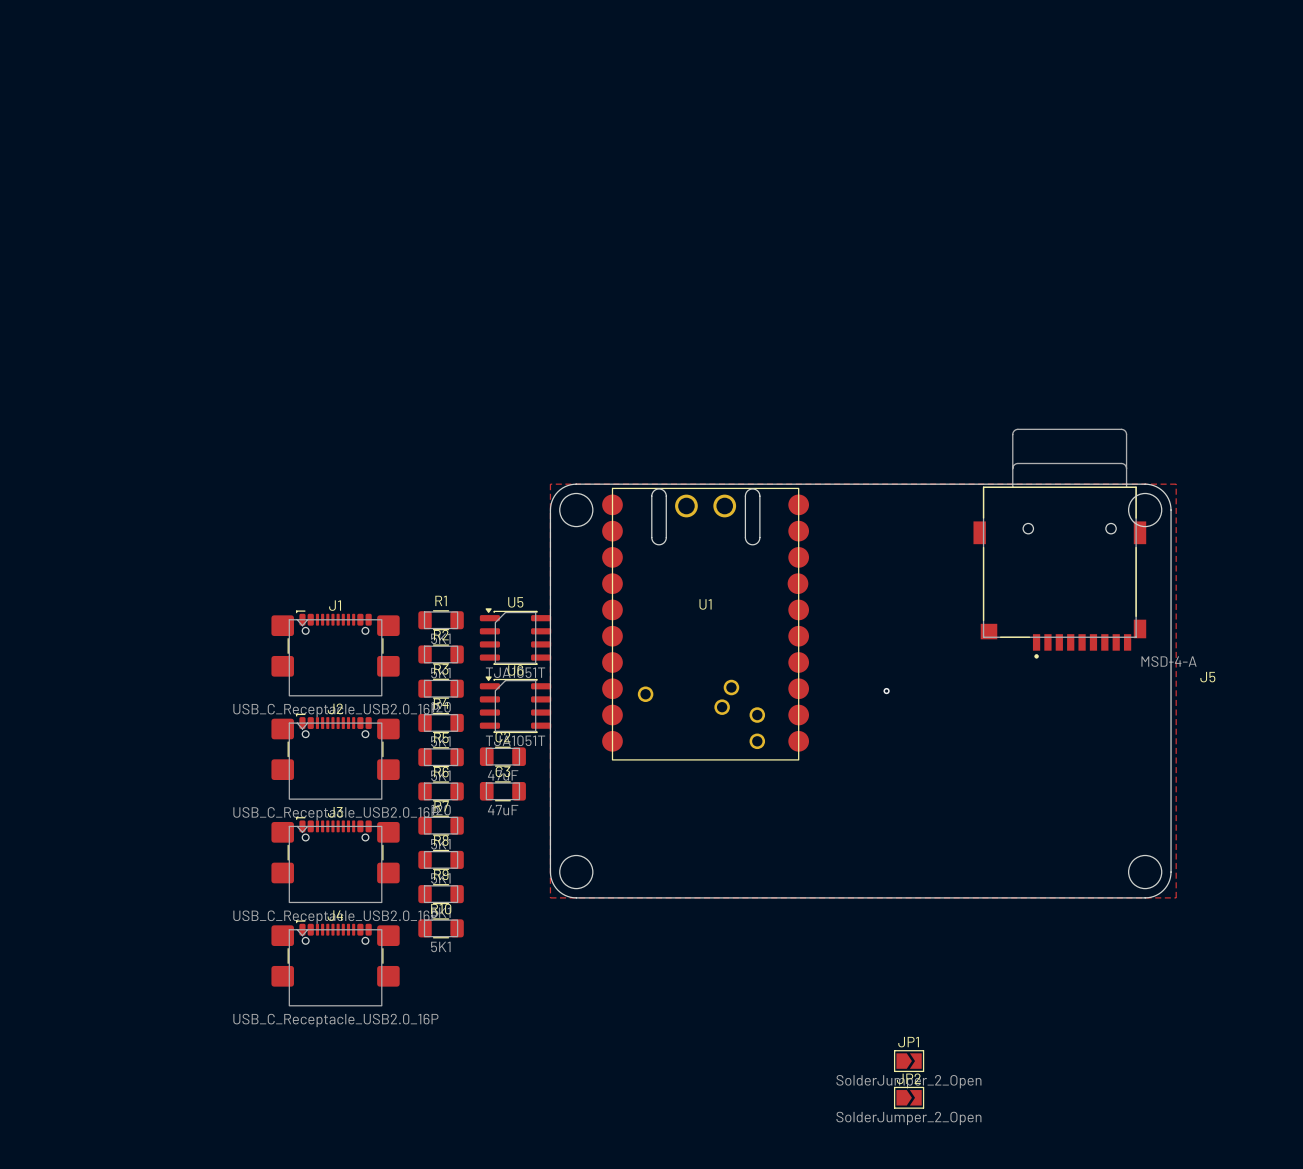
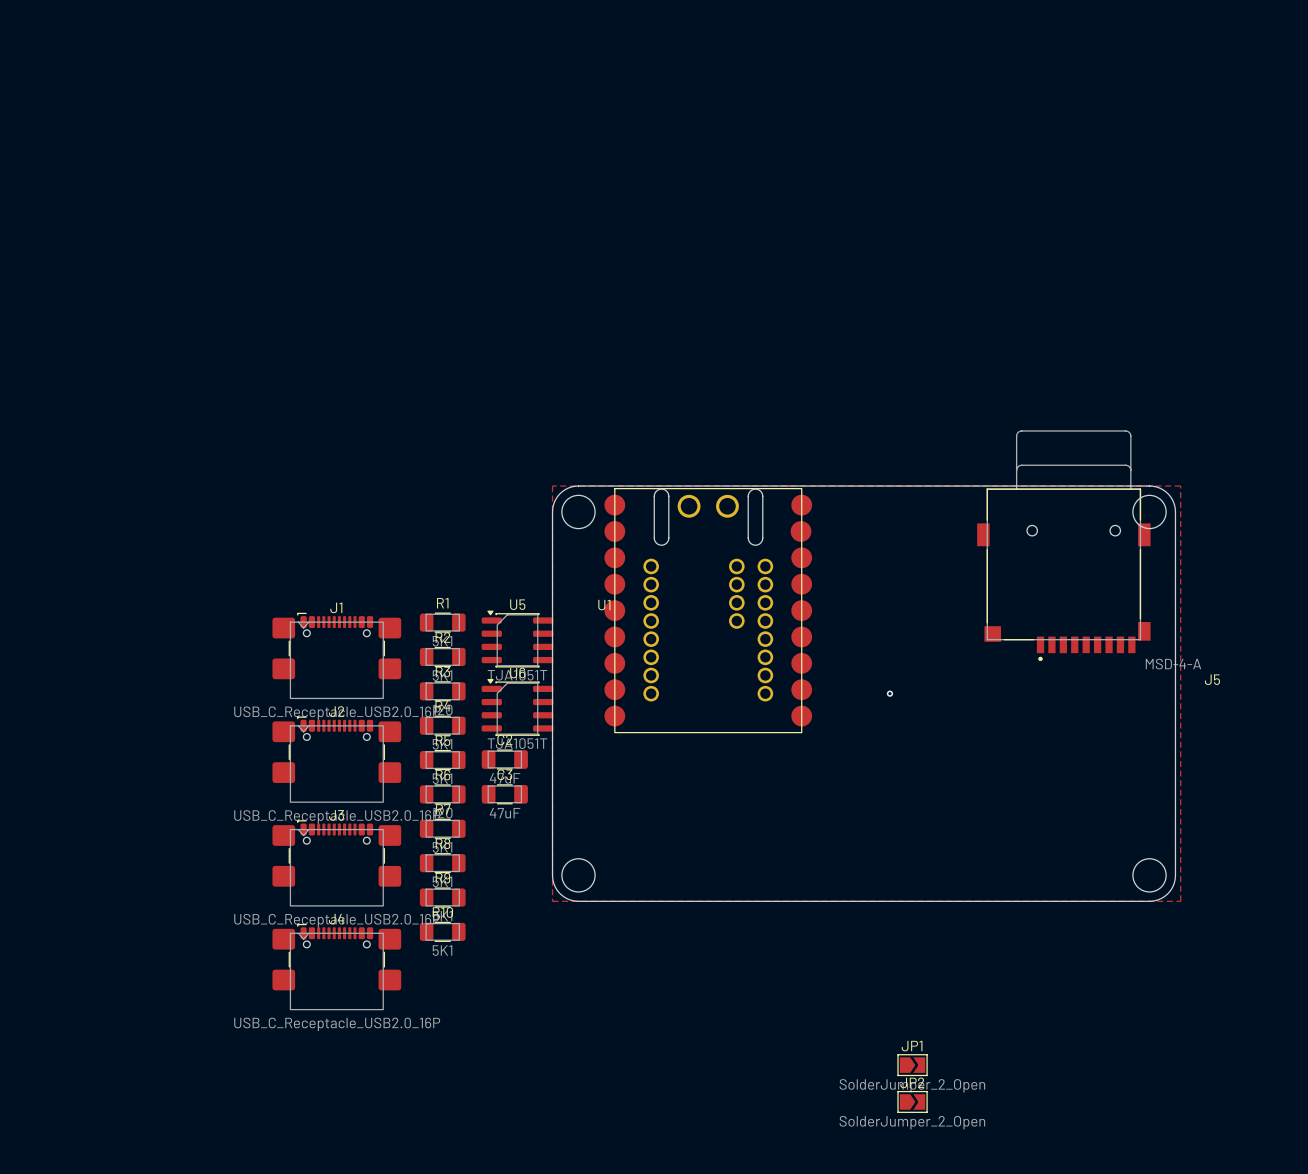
U1 footprint: [602, 487, 810, 761] -> [604, 488, 813, 734]
U1 name position: U1 (705, 604) -> U1 (604, 605)

